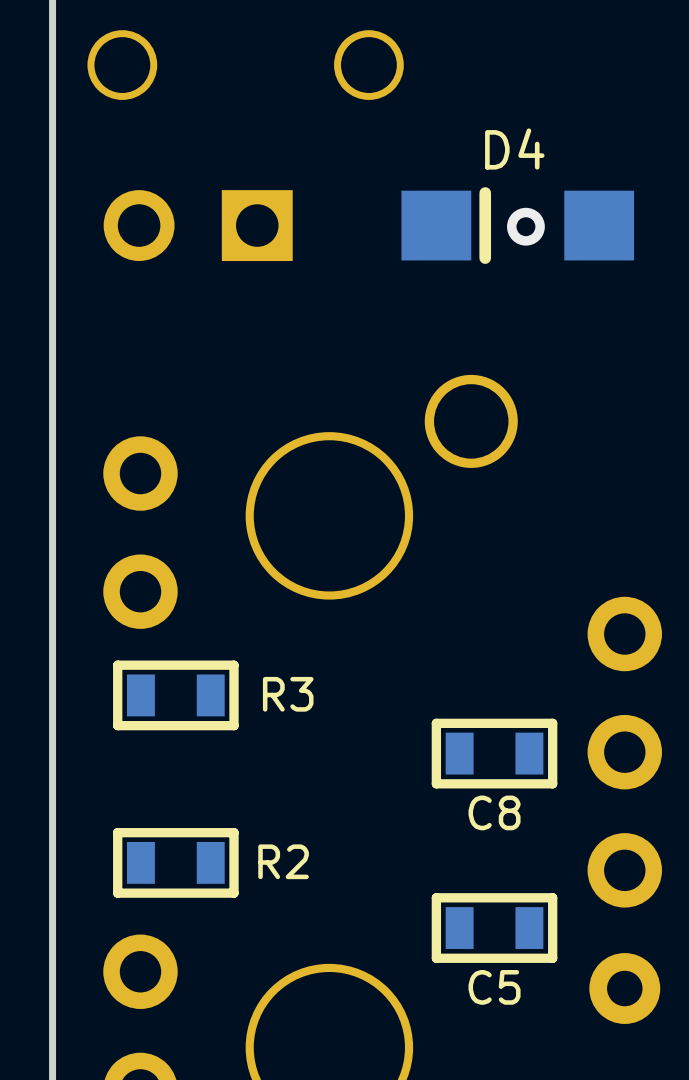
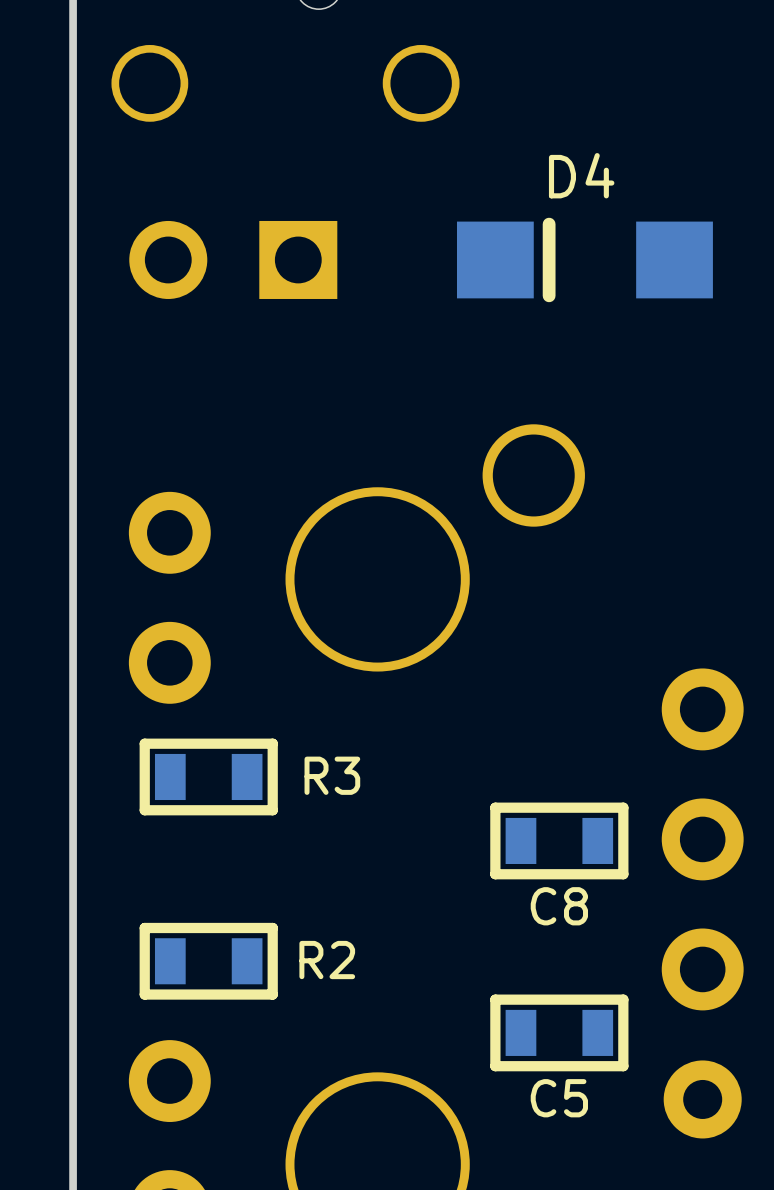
via: (525, 226) -> none

